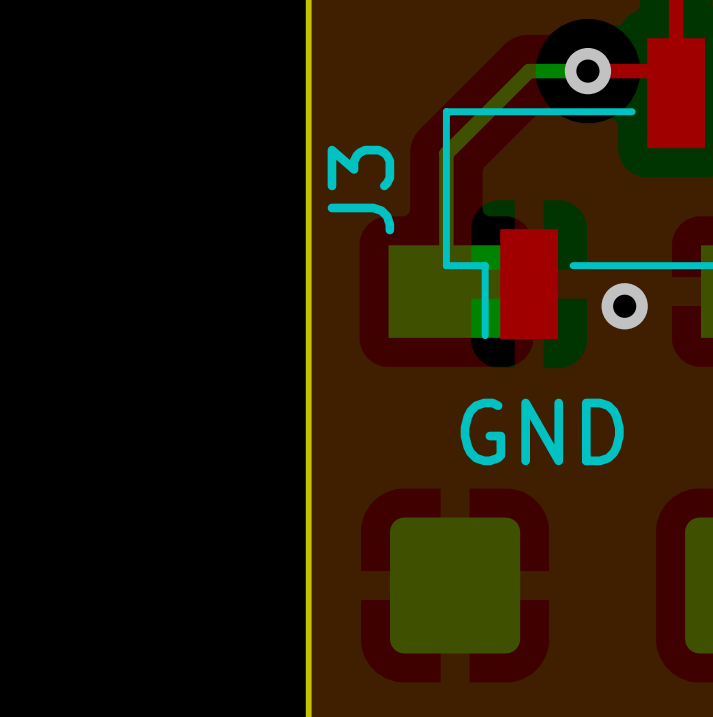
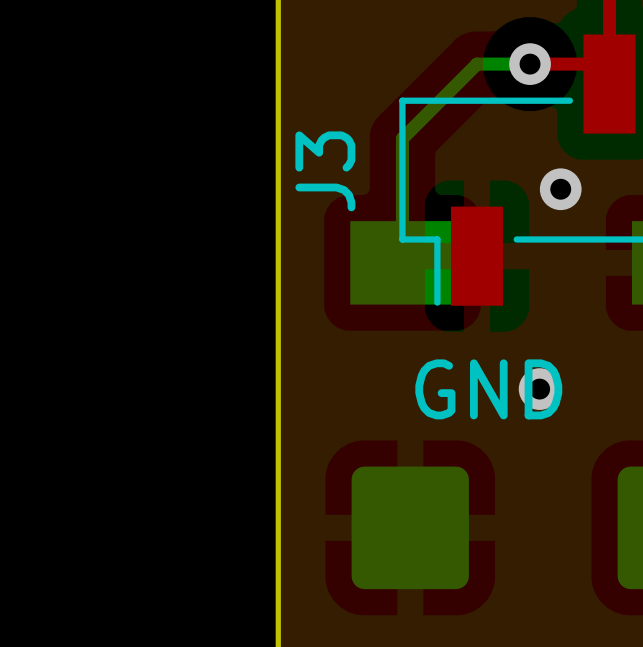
via: none -> (560, 189)
via: (624, 306) -> none
via: none -> (539, 389)

